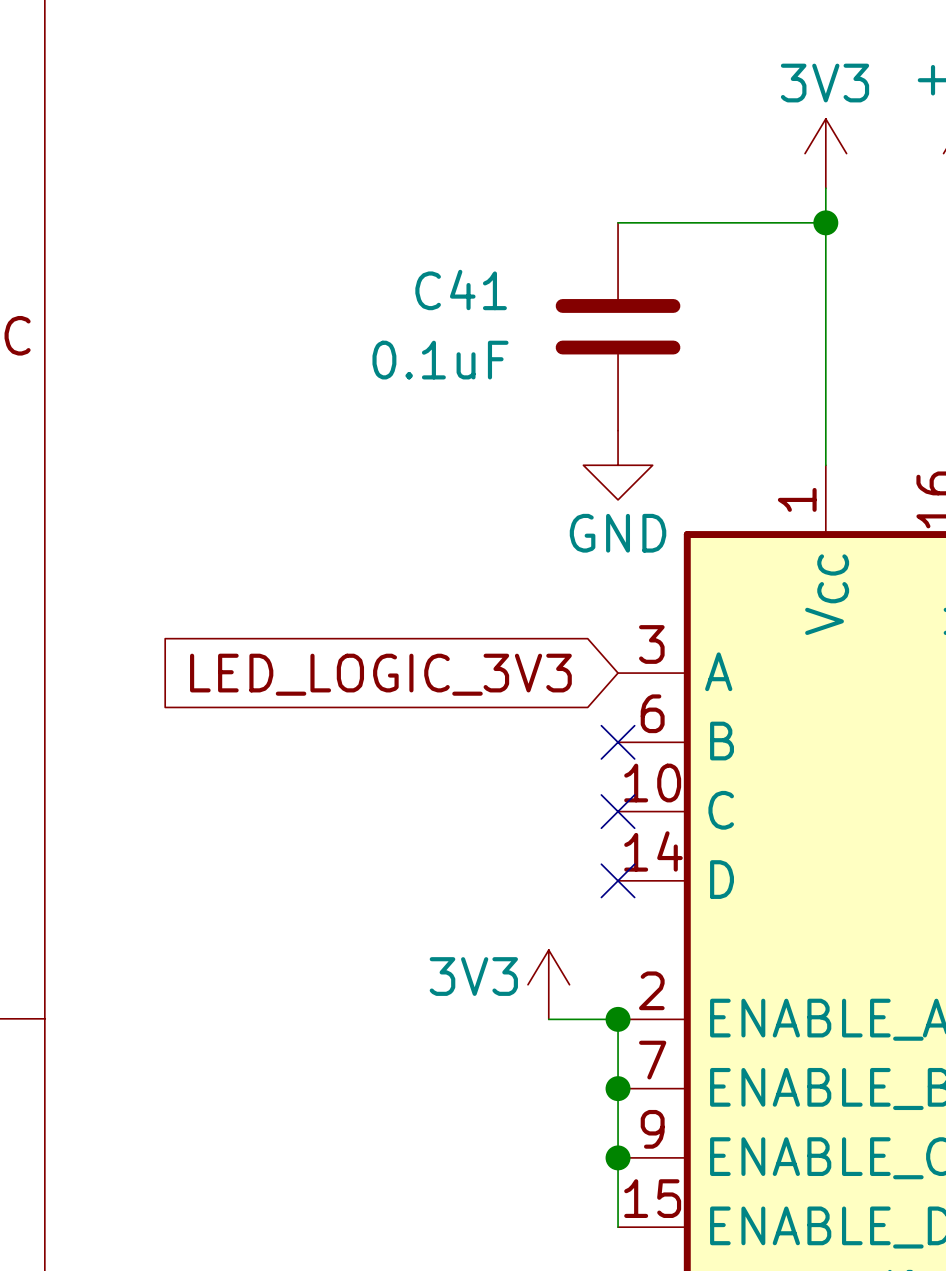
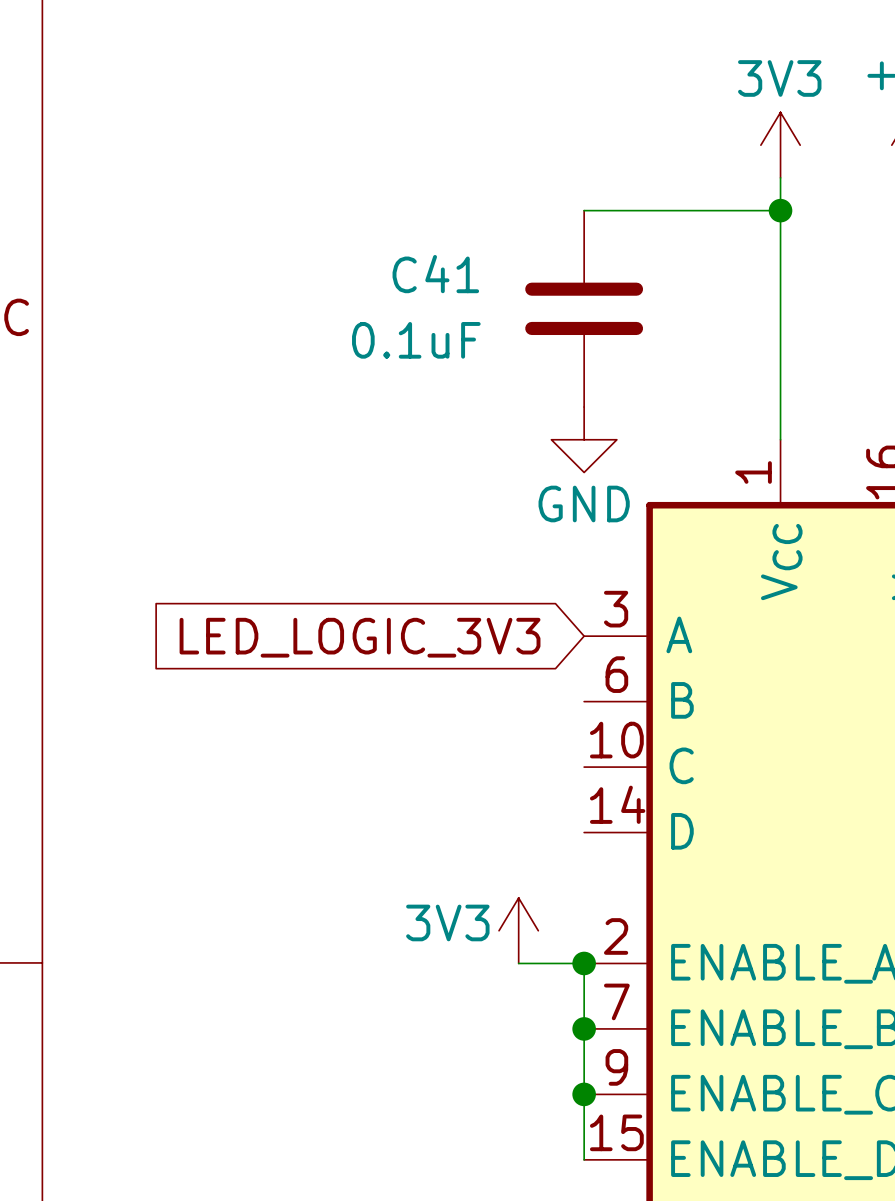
no-connect mark: (618, 742) -> none
no-connect mark: (618, 811) -> none
no-connect mark: (618, 880) -> none

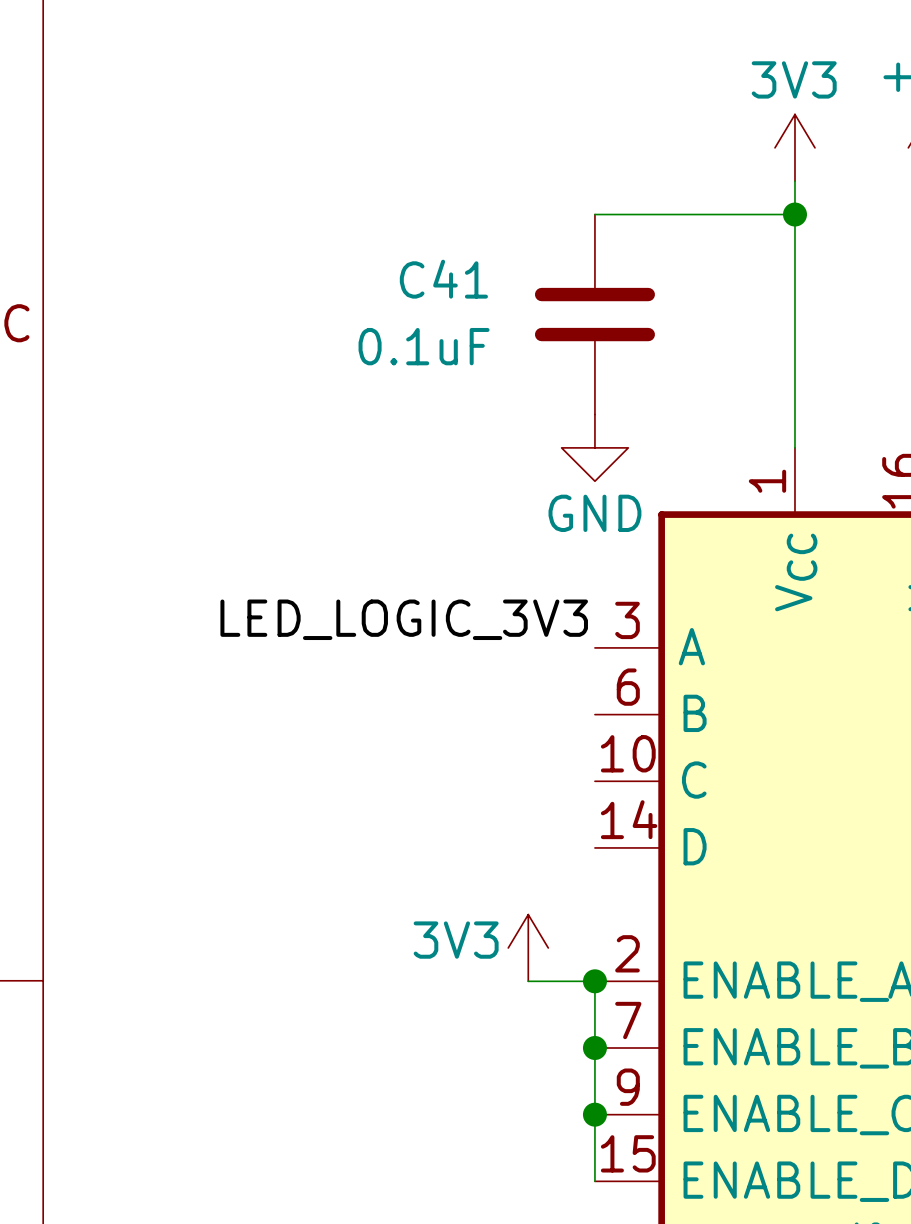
label: none -> LED_LOGIC_3V3 (404, 619)
global label: LED_LOGIC_3V3 (360, 637) -> none

